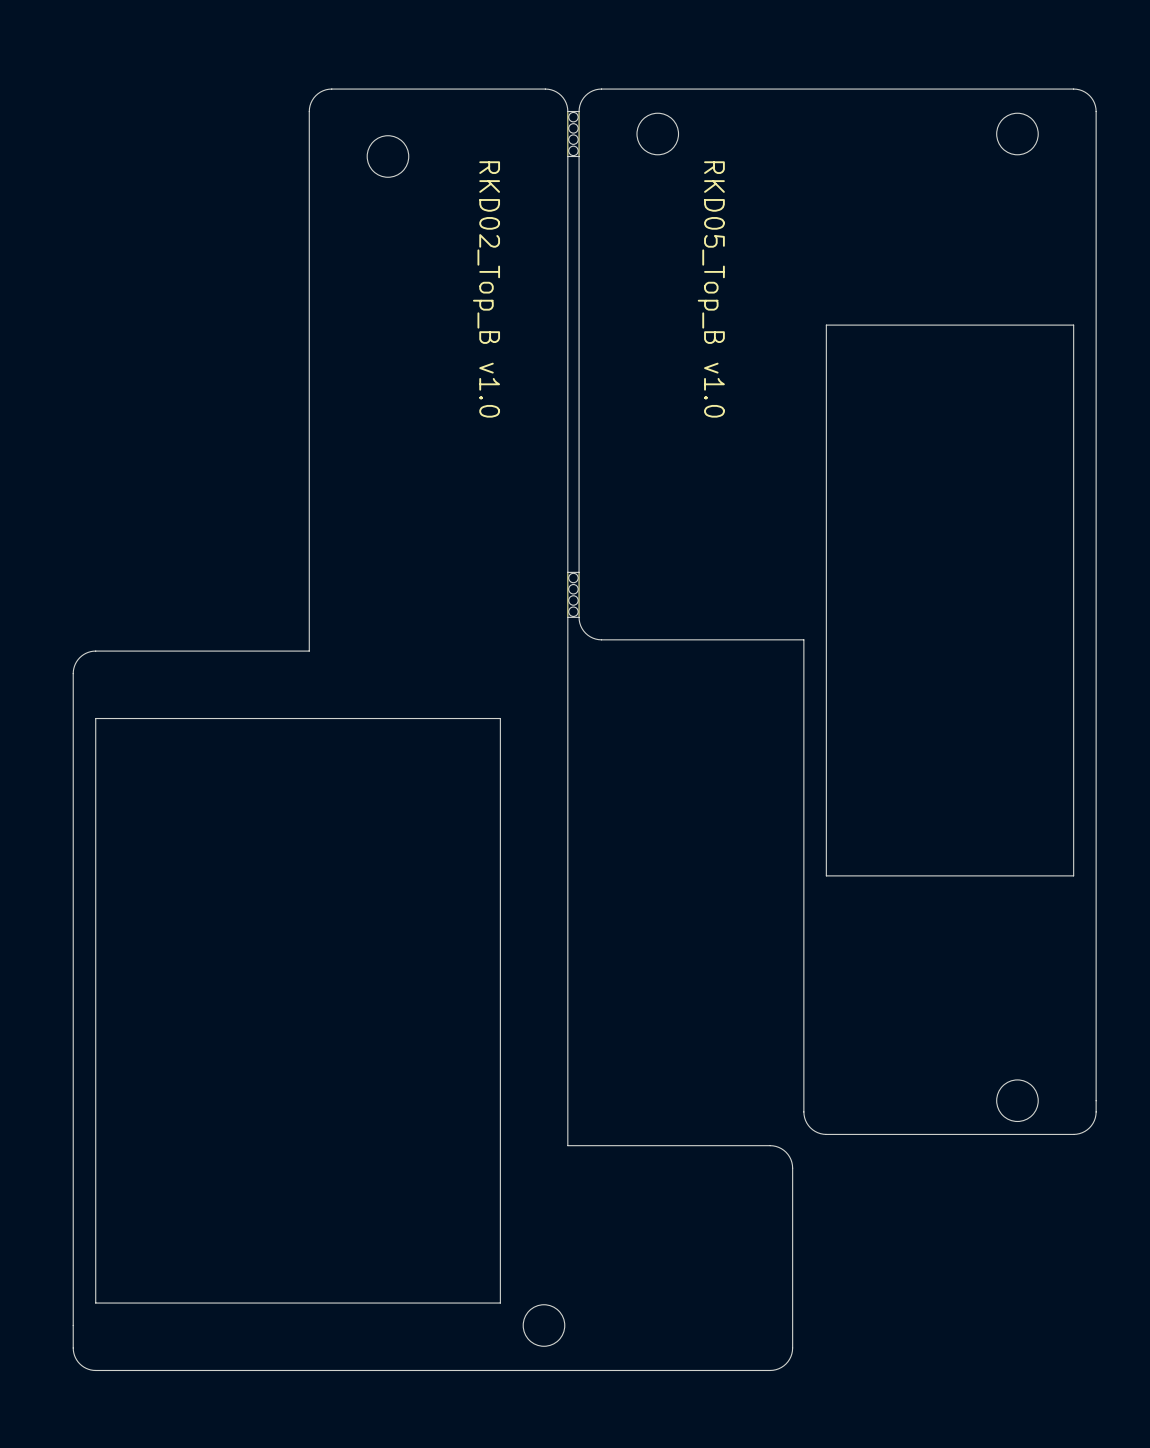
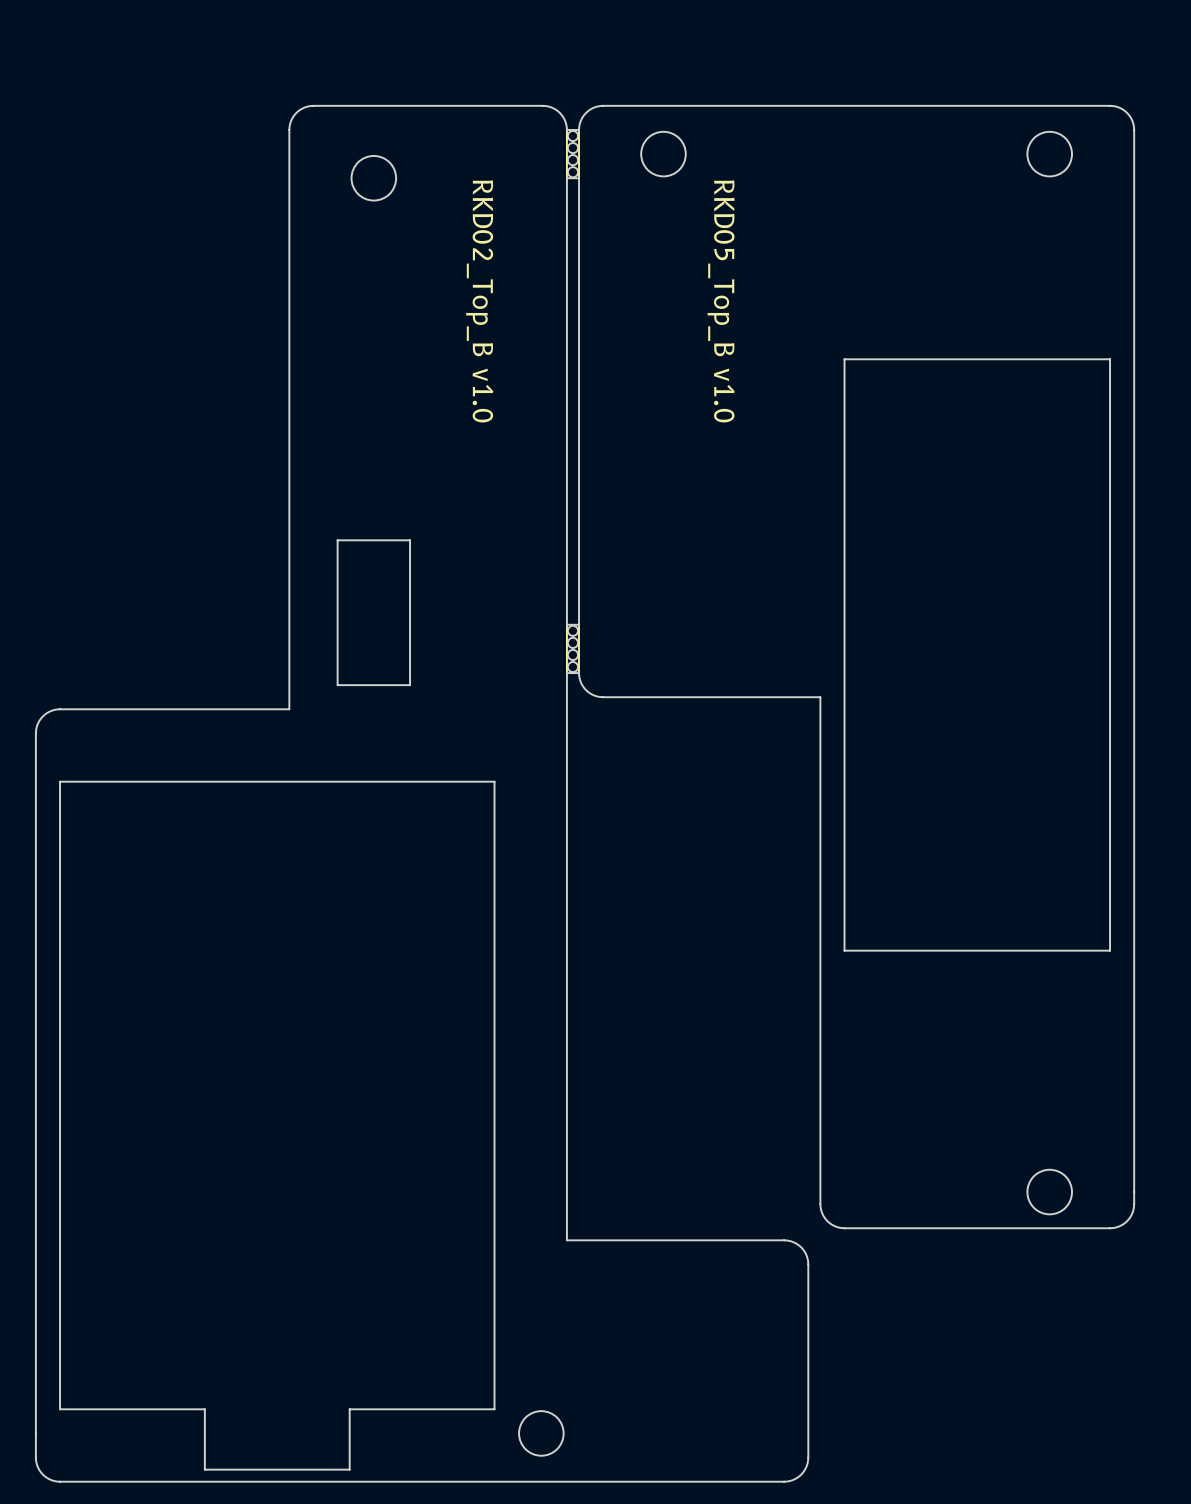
board edge: none -> (410, 540) (337, 540) (337, 685) (410, 685) (410, 540)
drawing shape: [95, 718, 501, 1304] -> [59, 781, 496, 1410]
board edge: none -> (349, 1409) (349, 1469) (204, 1469) (204, 1409)

